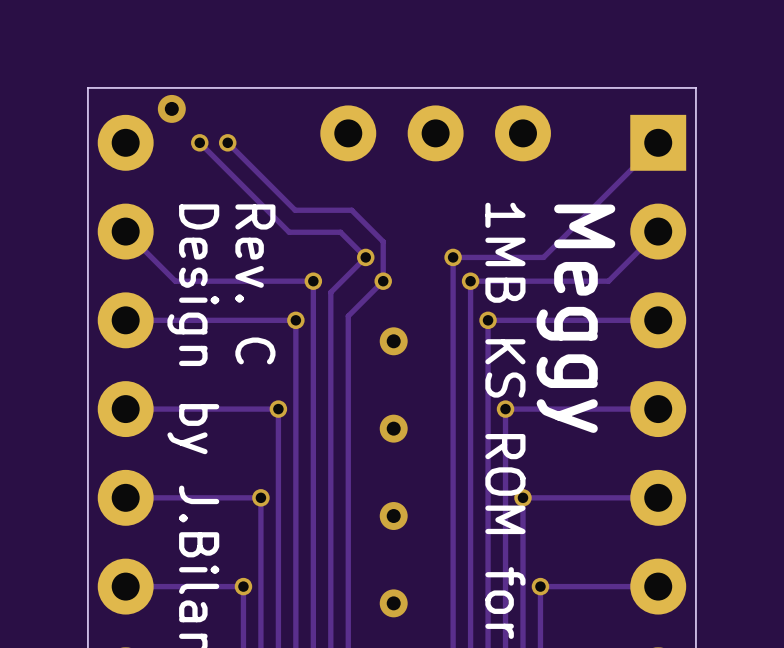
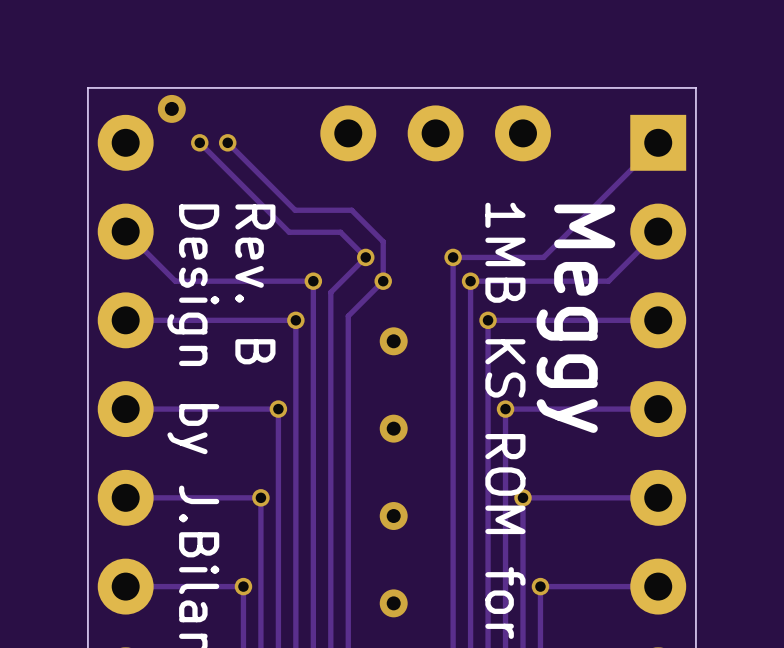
text: Rev. C (255, 284) -> Rev. B (255, 284)

